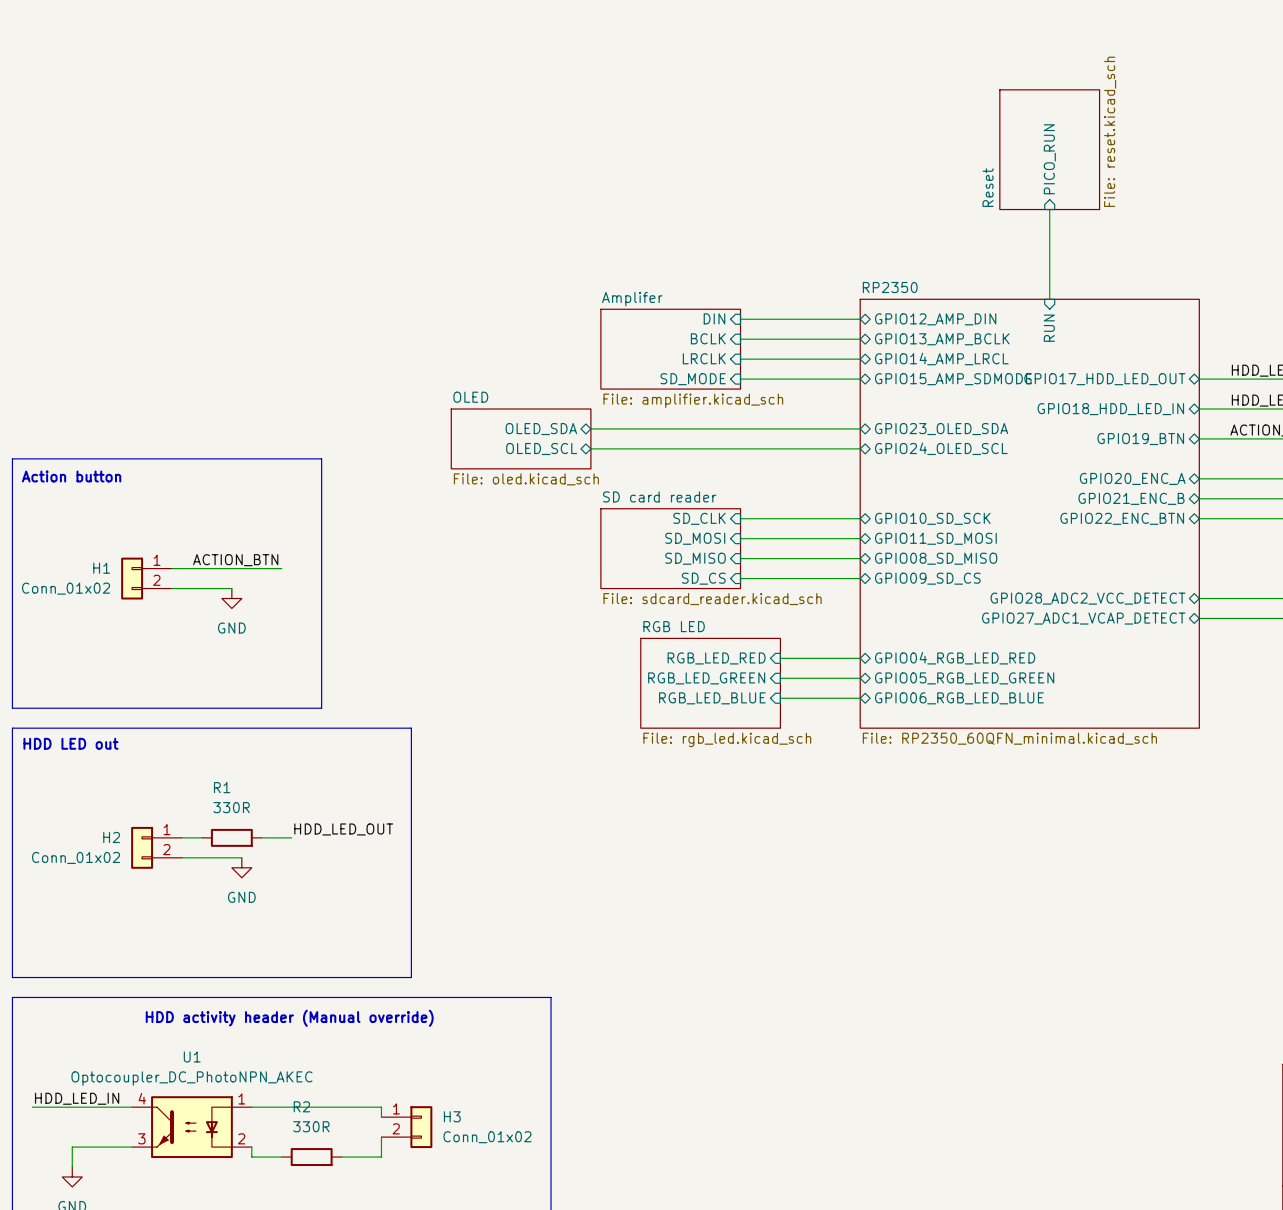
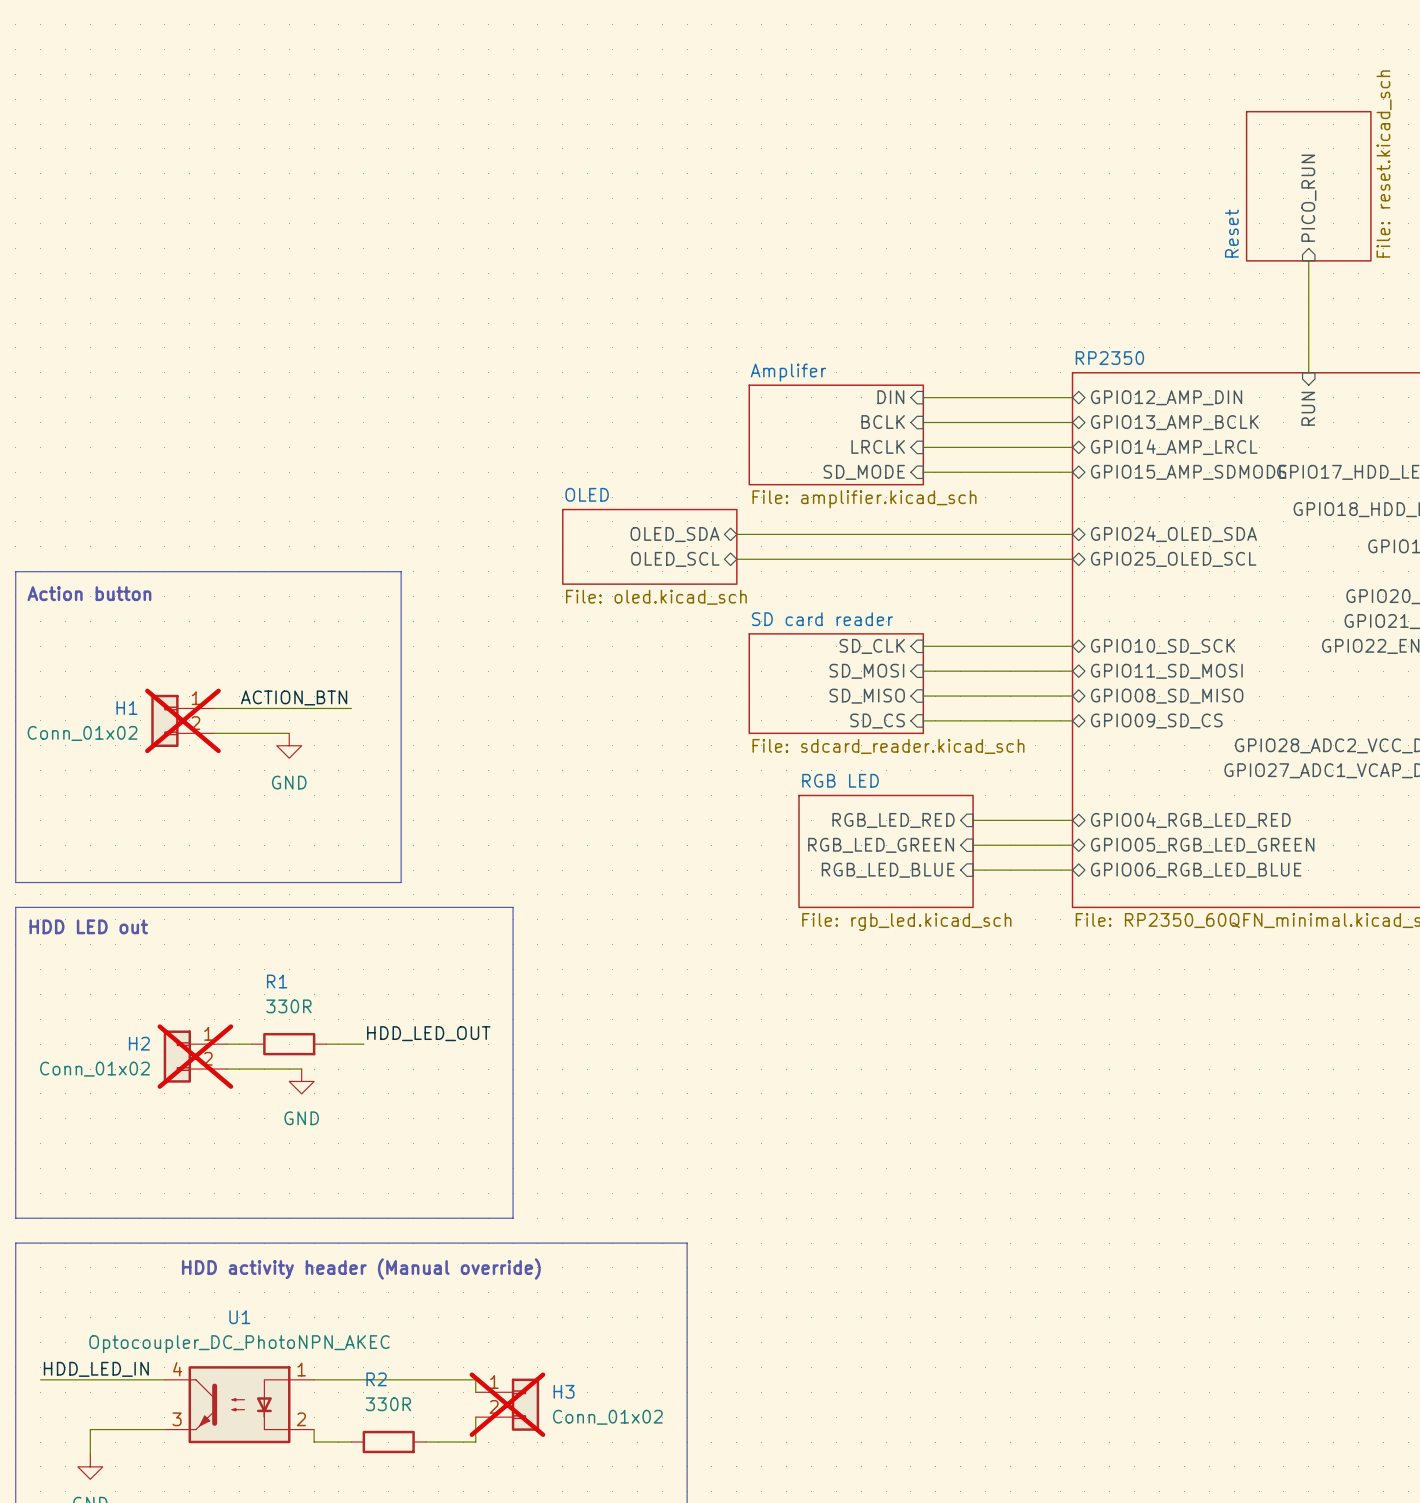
sheet pin: GPIO23_OLED_SDA (941, 429) -> GPIO24_OLED_SDA (1173, 534)
sheet pin: GPIO24_OLED_SCL (941, 448) -> GPIO25_OLED_SCL (1173, 559)
H1 do-not-place cross: none -> (182, 720)
H2 do-not-place cross: none -> (195, 1056)
H3 do-not-place cross: none -> (507, 1404)

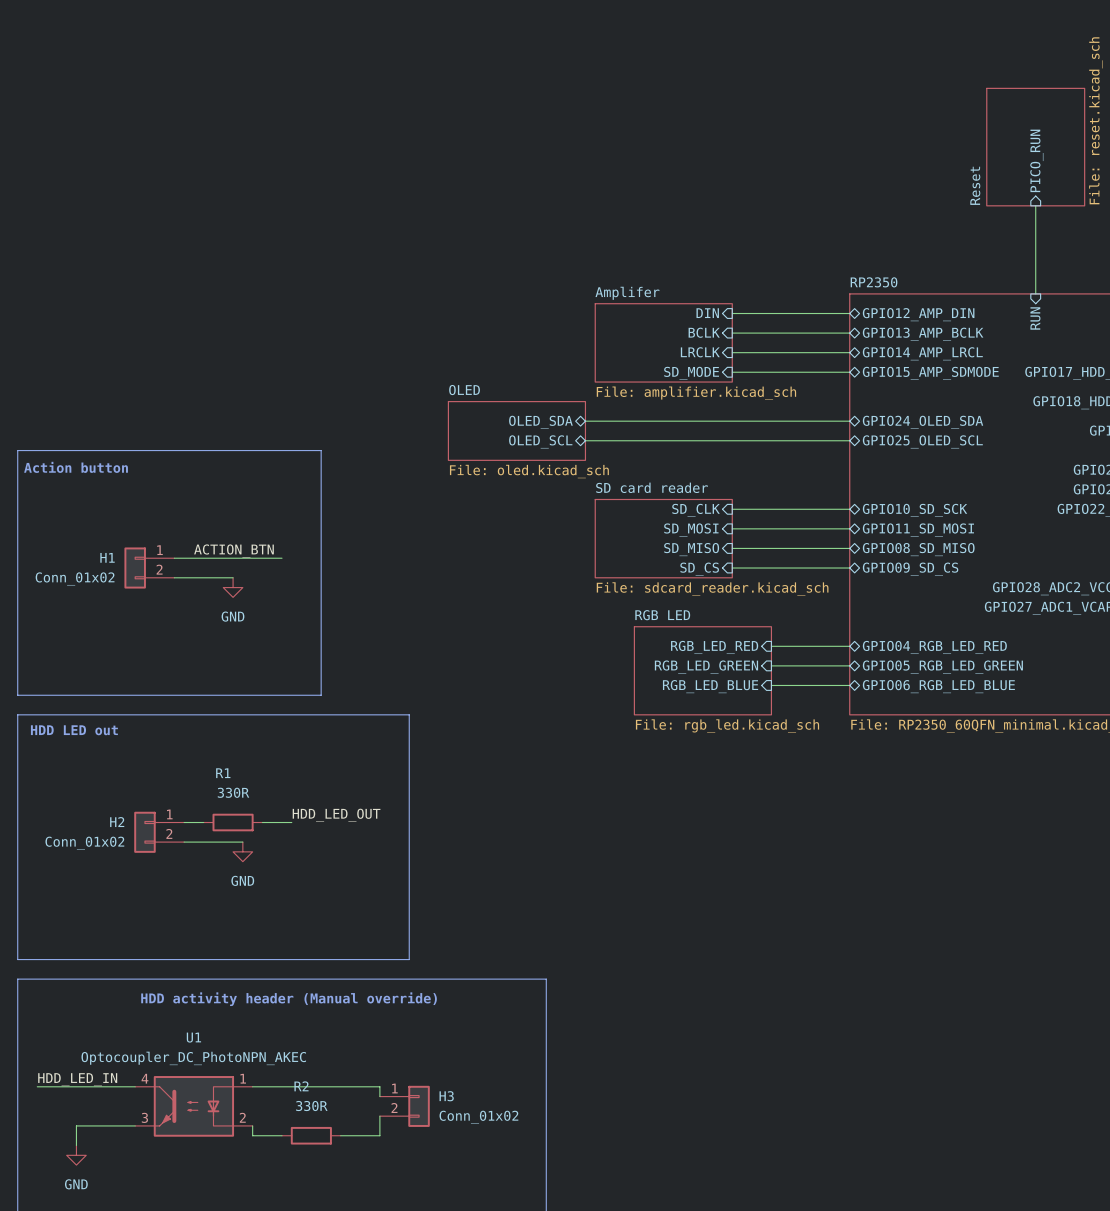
H1 do-not-place cross: (182, 720) -> none
H2 do-not-place cross: (195, 1056) -> none
H3 do-not-place cross: (507, 1404) -> none

